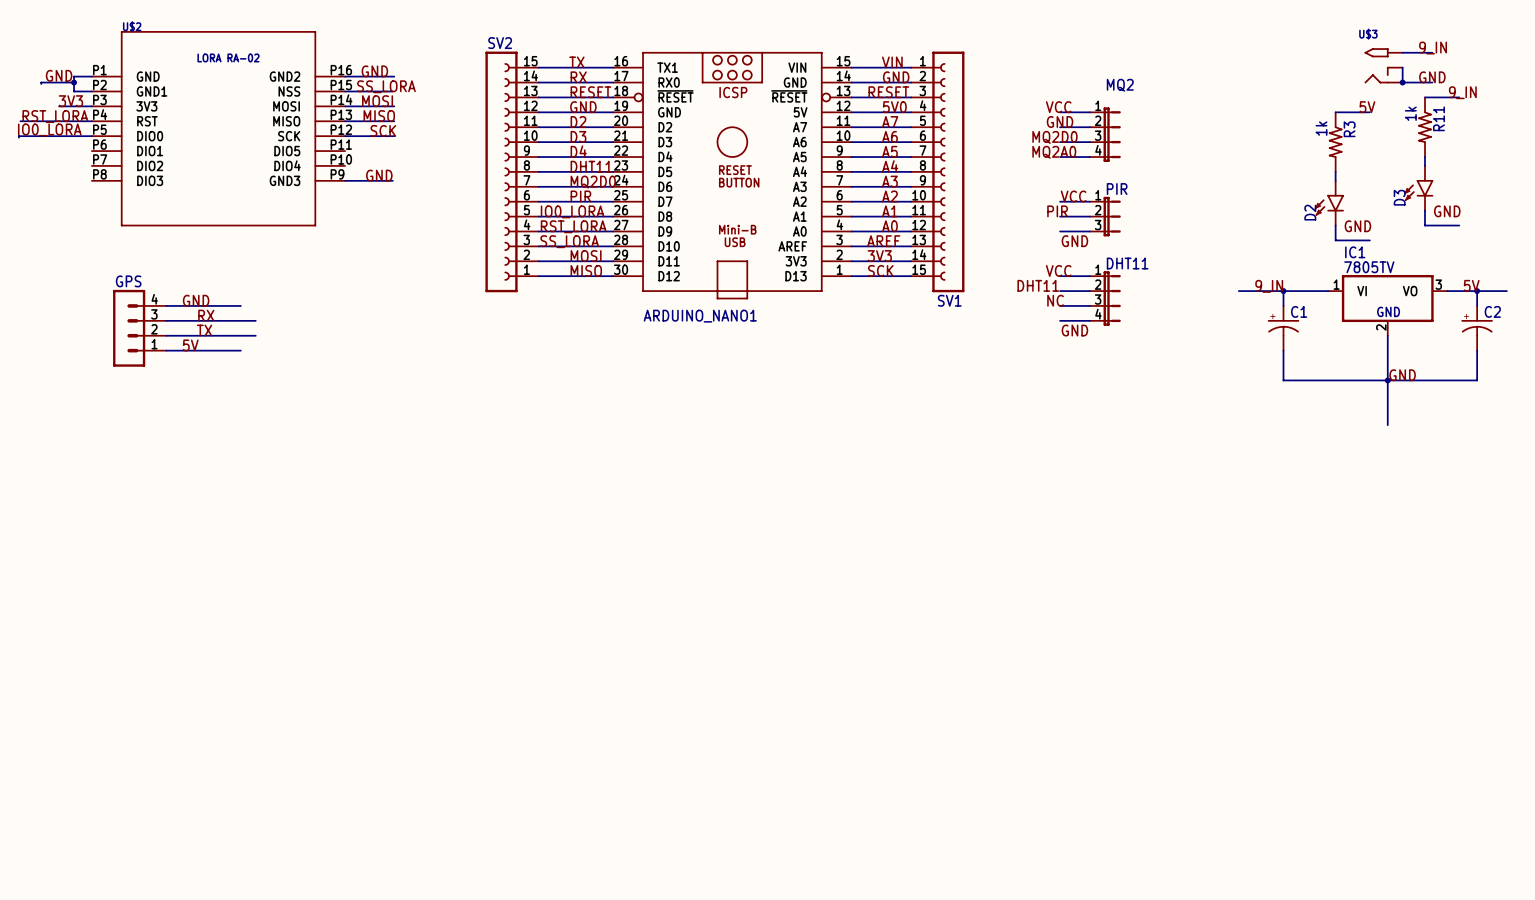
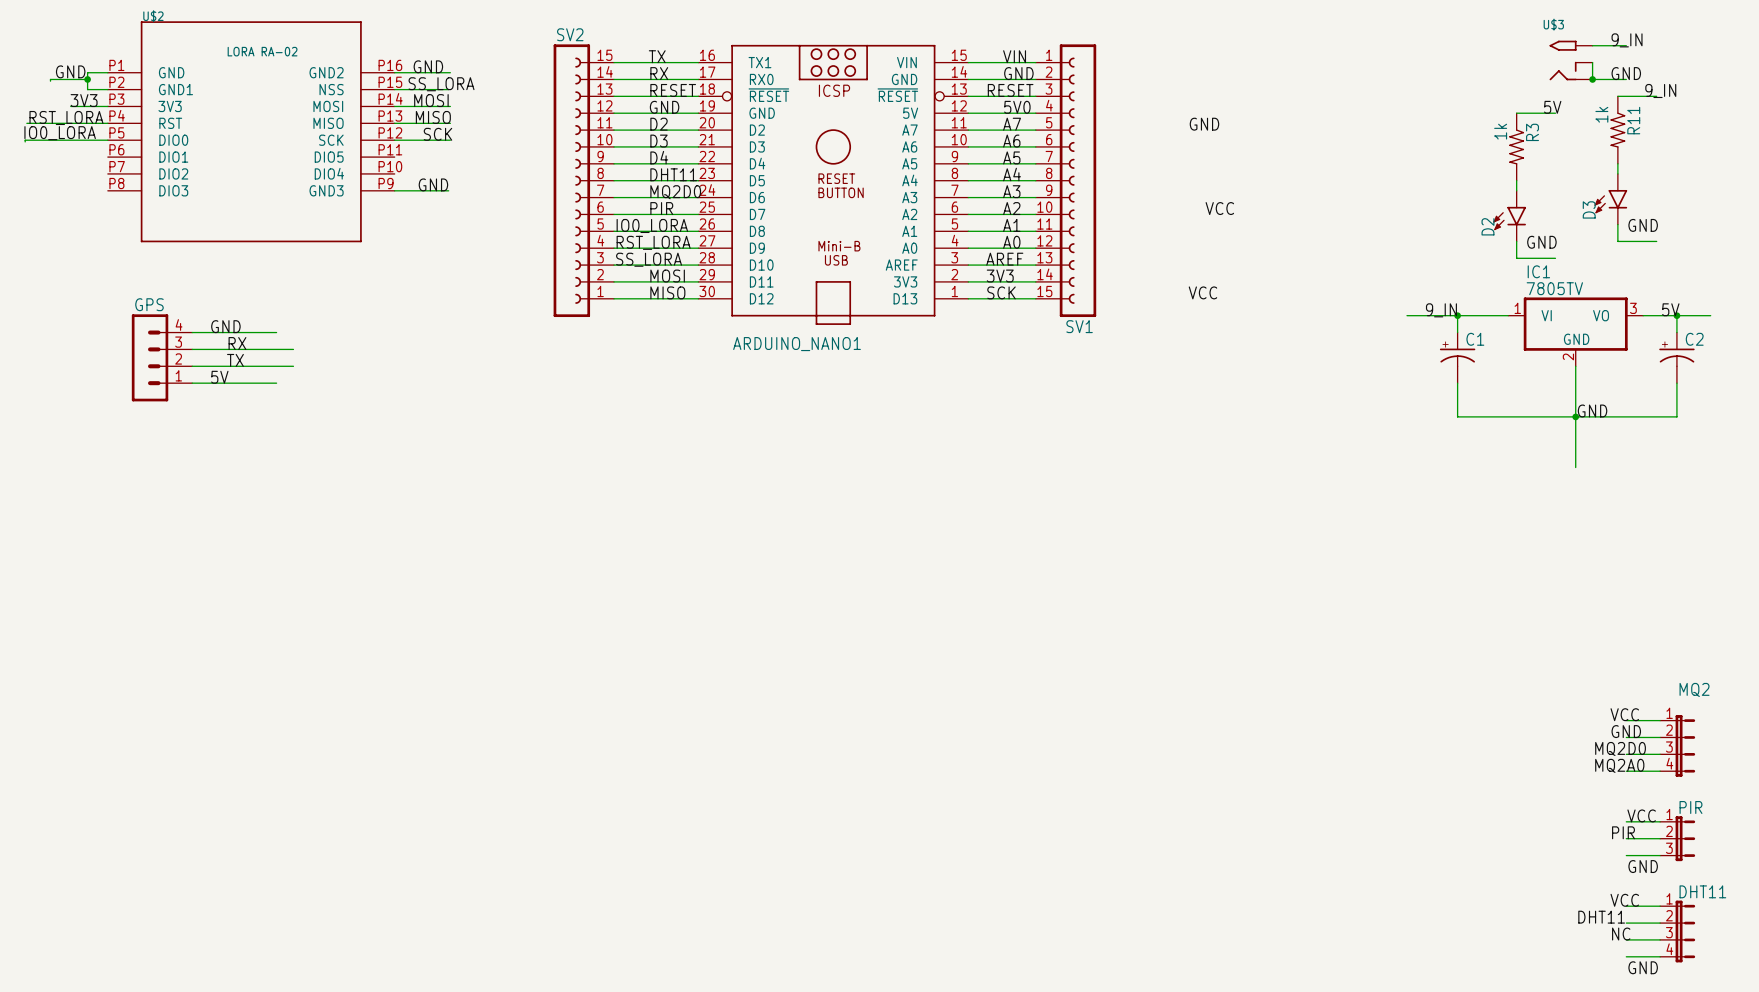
label: VCC (1058, 107) -> none
wire: (1060, 112) (1089, 112) -> none
wire: (1060, 127) (1089, 127) -> none
MQ2 position: (1105, 134) -> (1677, 745)
label: MQ2D0 (1054, 137) -> none
wire: (1060, 142) (1089, 142) -> none
label: MQ2A0 (1054, 152) -> none
wire: (1060, 157) (1089, 157) -> none
wire: (1060, 201) (1089, 201) -> none
label: PIR (1057, 211) -> none
wire: (1060, 216) (1089, 216) -> none
PIR: (1105, 216) -> none
wire: (1060, 231) (1089, 231) -> none
label: GND (1074, 241) -> none
wire: (1060, 276) (1089, 276) -> none
label: DHT11 (1038, 285) -> none
wire: (1060, 291) (1089, 291) -> none
DHT11 position: (1105, 298) -> (1677, 931)
label: NC (1055, 300) -> none
wire: (1060, 305) (1089, 305) -> none
wire: (1060, 320) (1089, 320) -> none
label: GND (1074, 330) -> none
label: none -> VCC (1624, 714)
wire: none -> (1626, 720) (1660, 720)
label: none -> GND (1626, 731)
wire: none -> (1626, 737) (1660, 737)
label: none -> MQ2D0 (1620, 749)
wire: none -> (1626, 754) (1660, 754)
label: none -> MQ2A0 (1619, 765)
wire: none -> (1626, 771) (1660, 771)
label: none -> VCC (1641, 815)
wire: none -> (1626, 821) (1660, 821)
label: none -> PIR (1623, 832)
wire: none -> (1626, 838) (1660, 838)
PIR: none -> (1677, 838)
wire: none -> (1626, 855) (1660, 855)
label: none -> GND (1643, 866)
label: none -> VCC (1624, 900)
wire: none -> (1626, 906) (1660, 906)
label: none -> DHT11 (1601, 917)
wire: none -> (1626, 923) (1660, 923)
label: none -> NC (1621, 934)
wire: none -> (1626, 939) (1660, 939)
wire: none -> (1626, 956) (1660, 956)
label: none -> GND (1643, 967)

